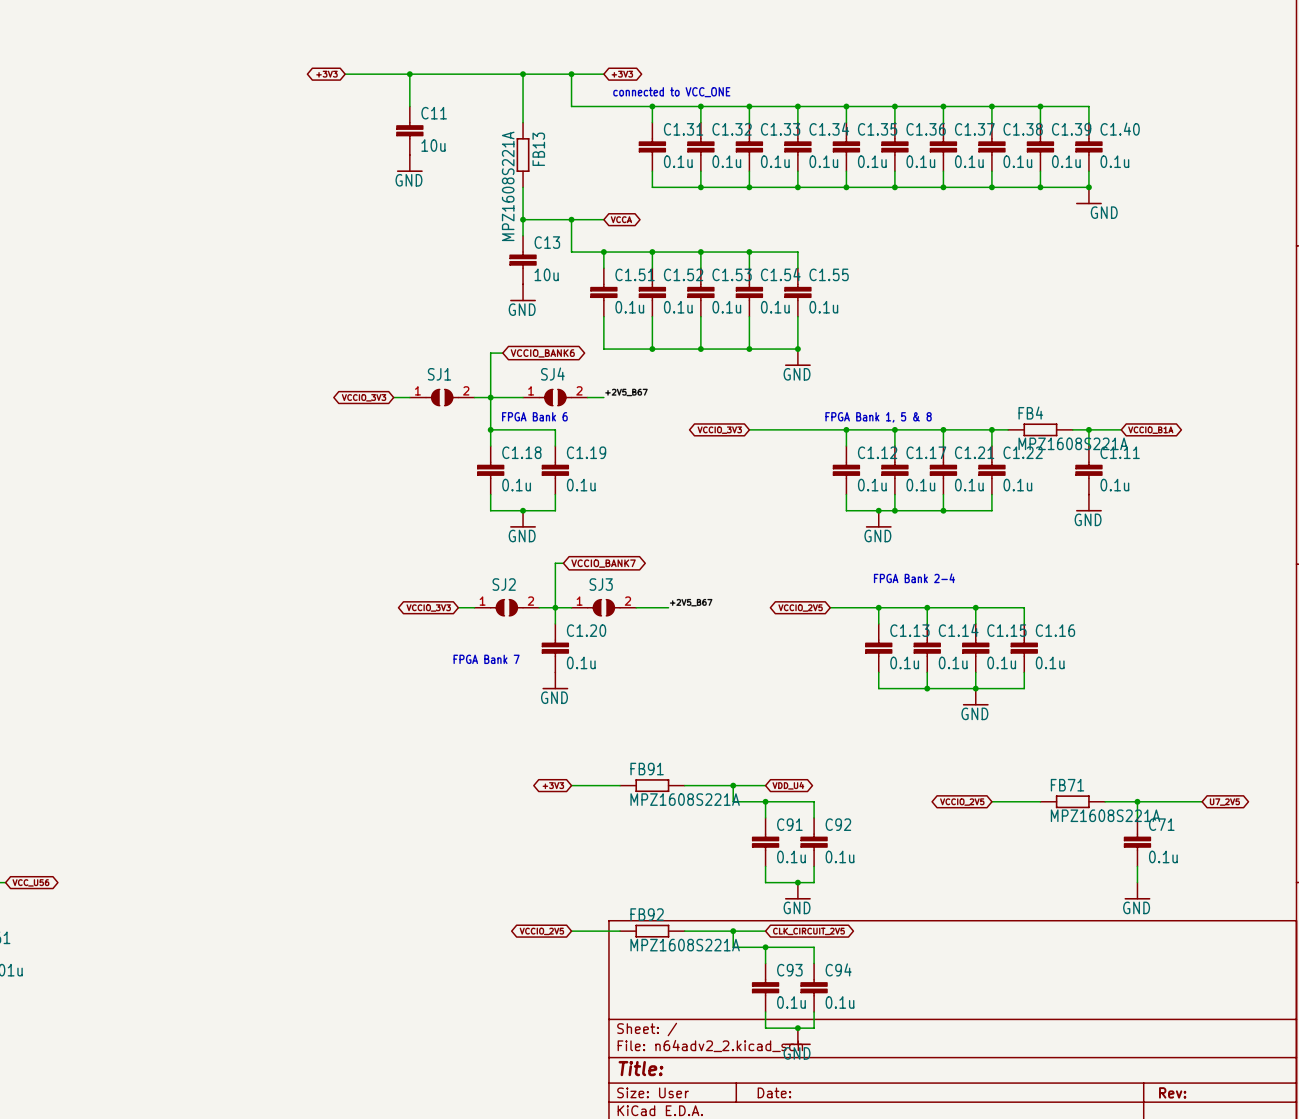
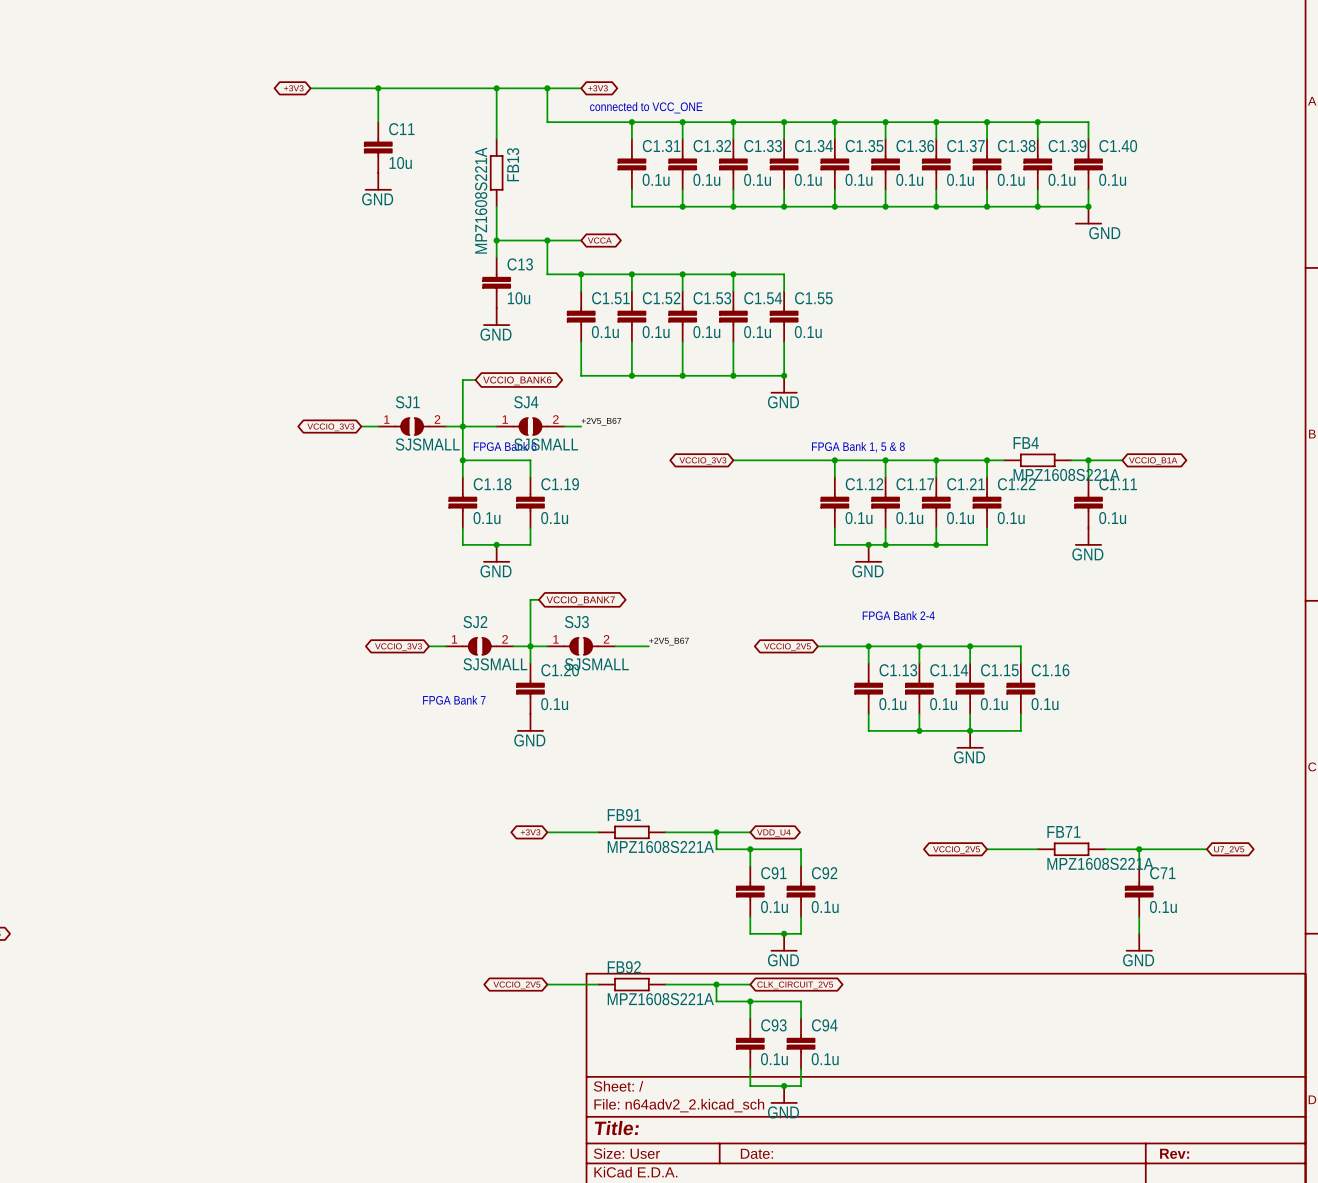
SJ1 value: none -> SJSMALL (427, 444)
SJ4 value: none -> SJSMALL (546, 444)
SJ2 value: none -> SJSMALL (495, 664)
SJ3 value: none -> SJSMALL (596, 664)

